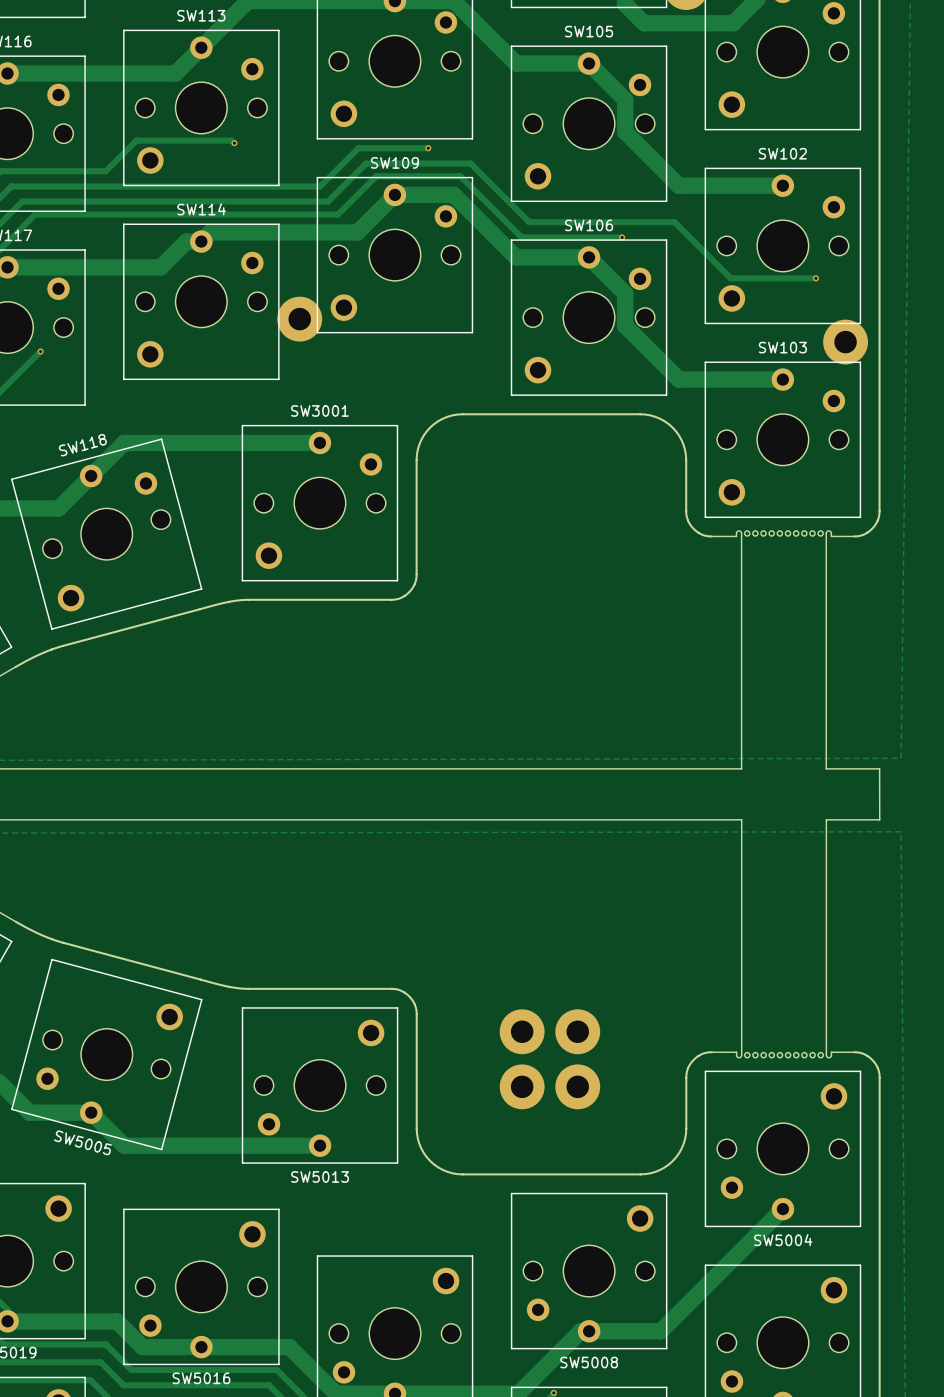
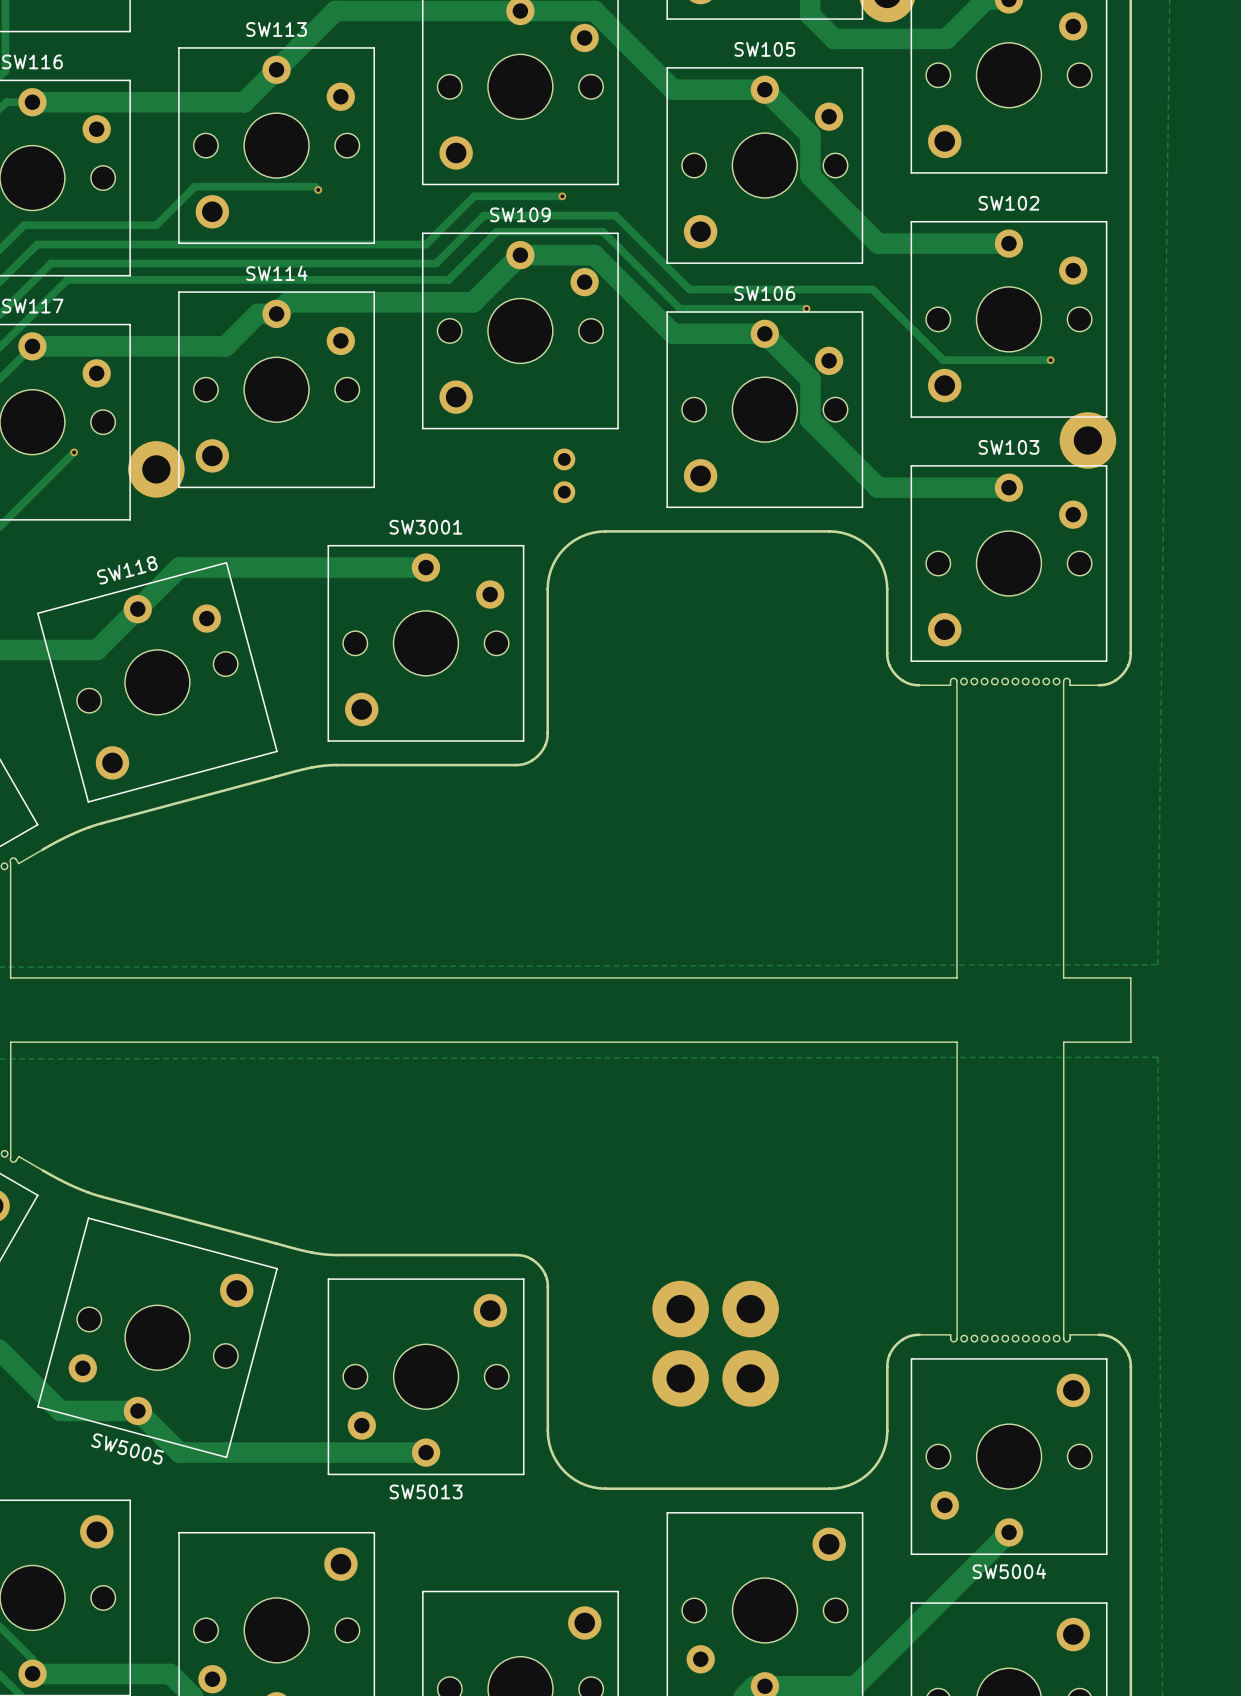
part position: (299, 319) -> (156, 469)
part: none -> (564, 475)

